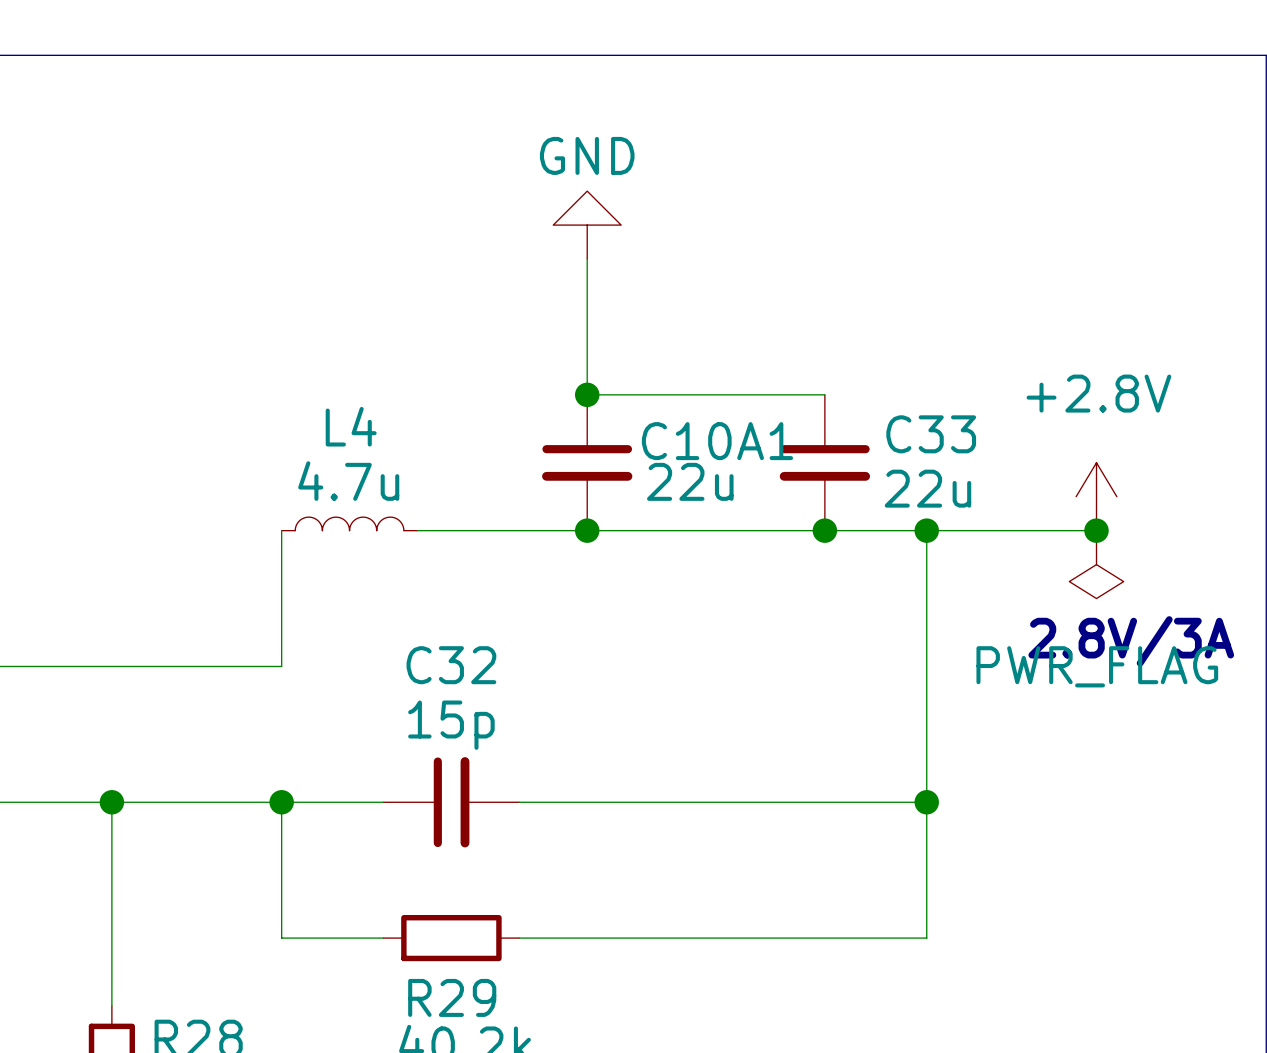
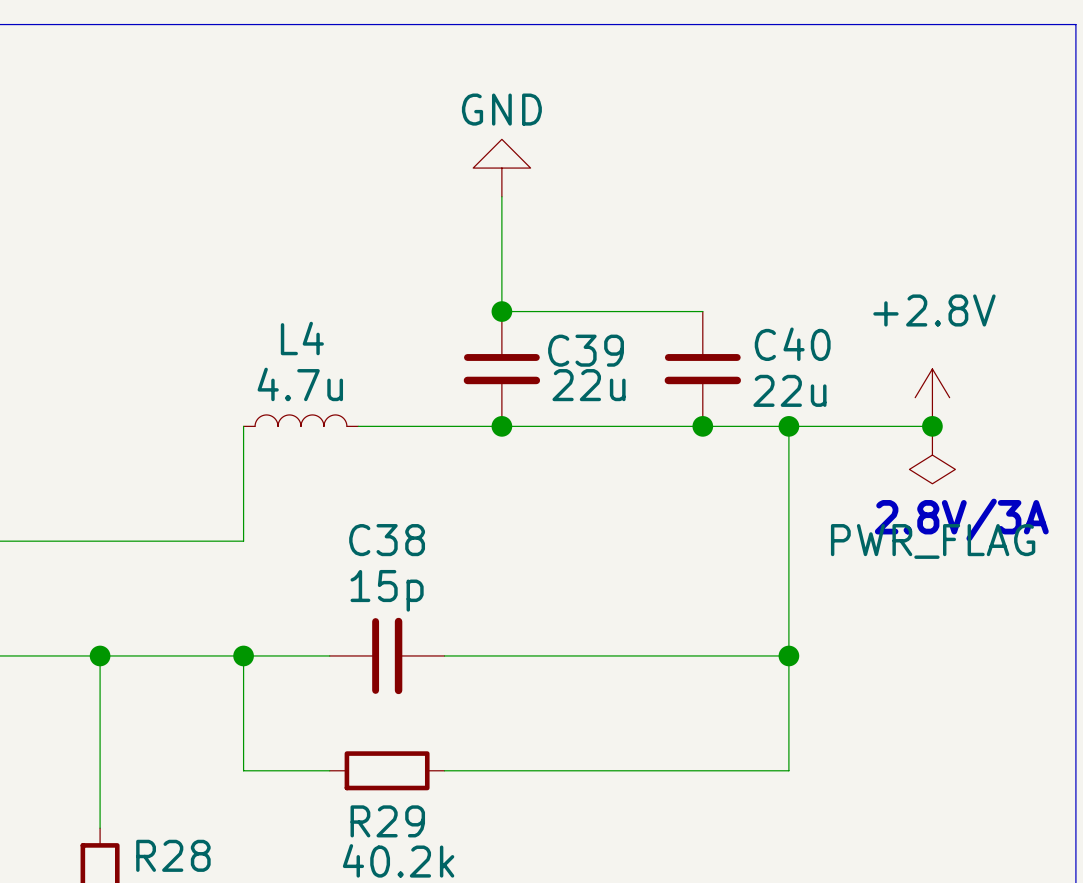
C33 name: C33 (931, 434) -> C40 (792, 344)
C10A1 name: C10A1 (717, 441) -> C39 (586, 350)
C32 name: C32 (451, 665) -> C38 (387, 540)

